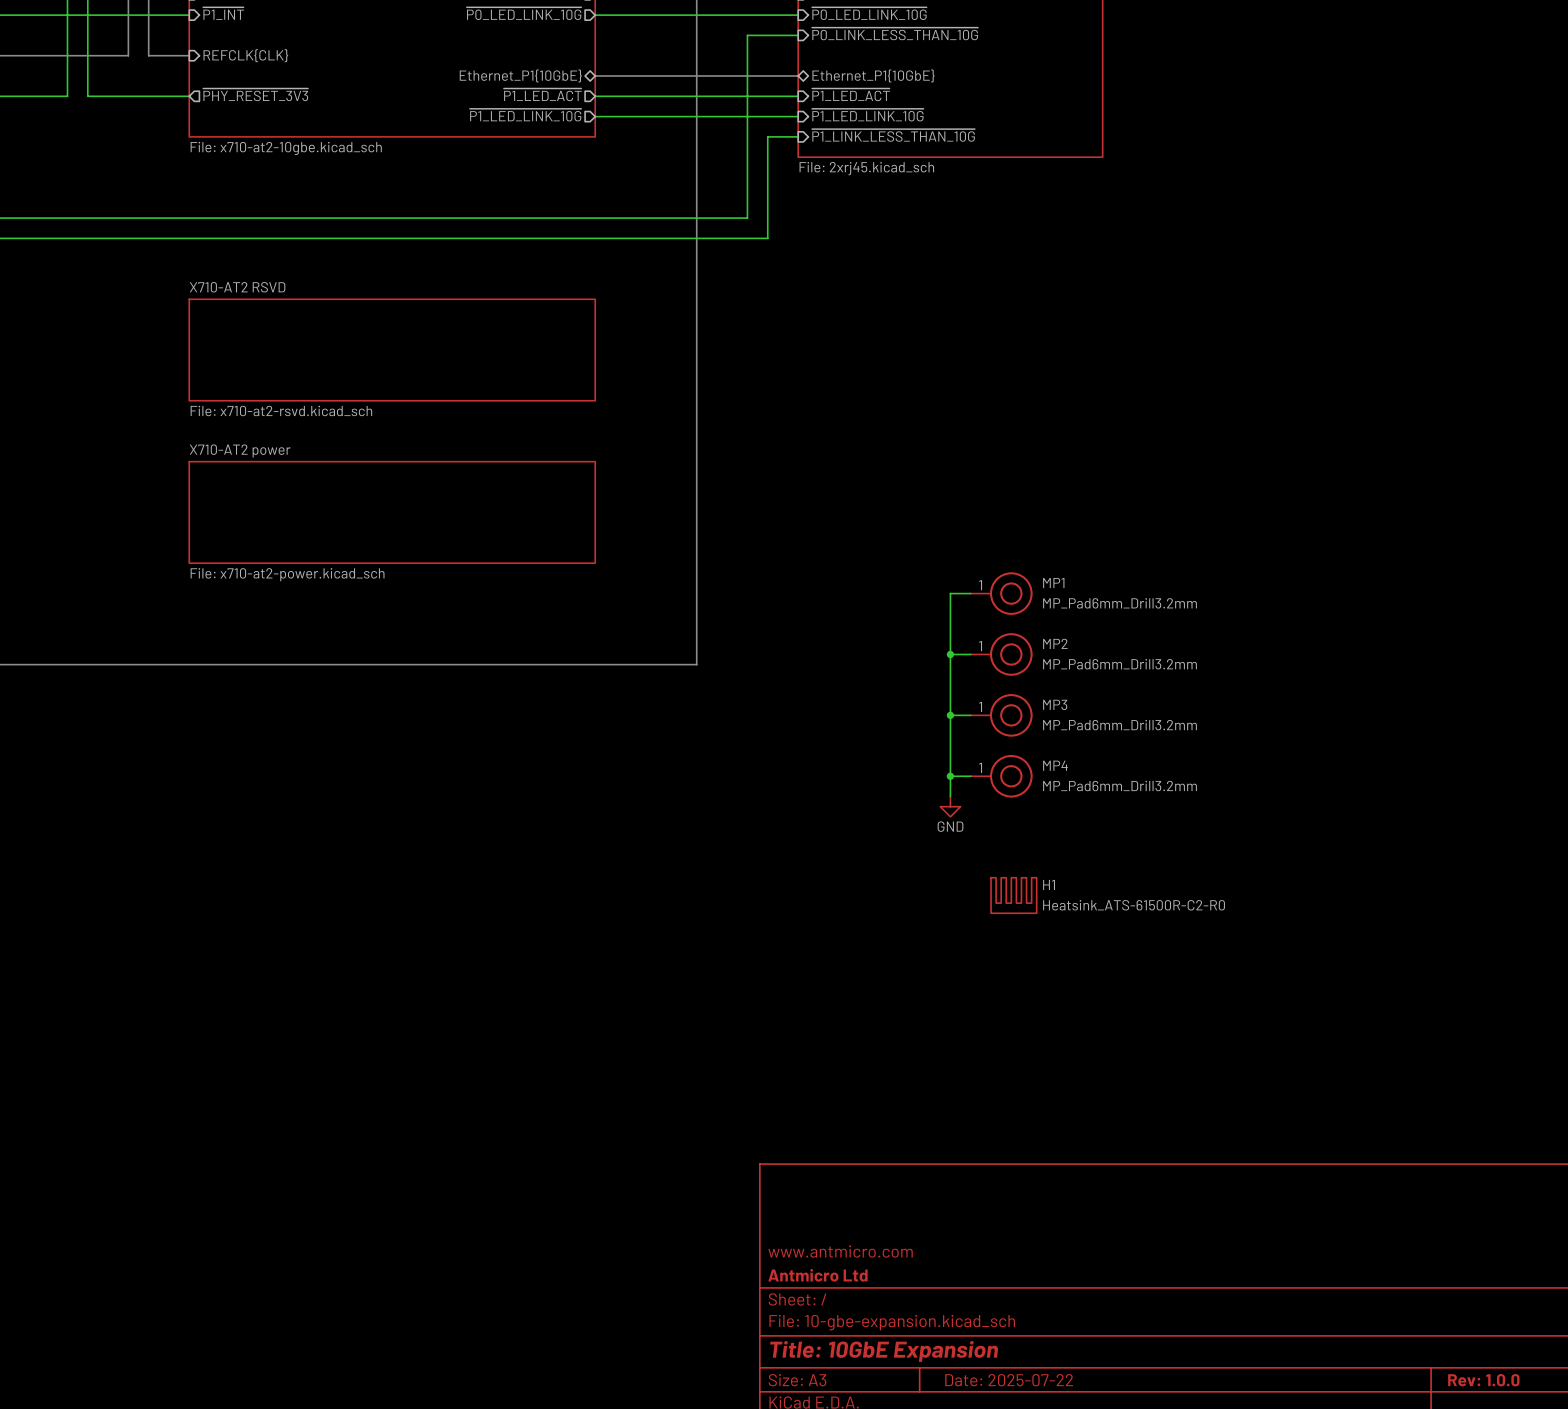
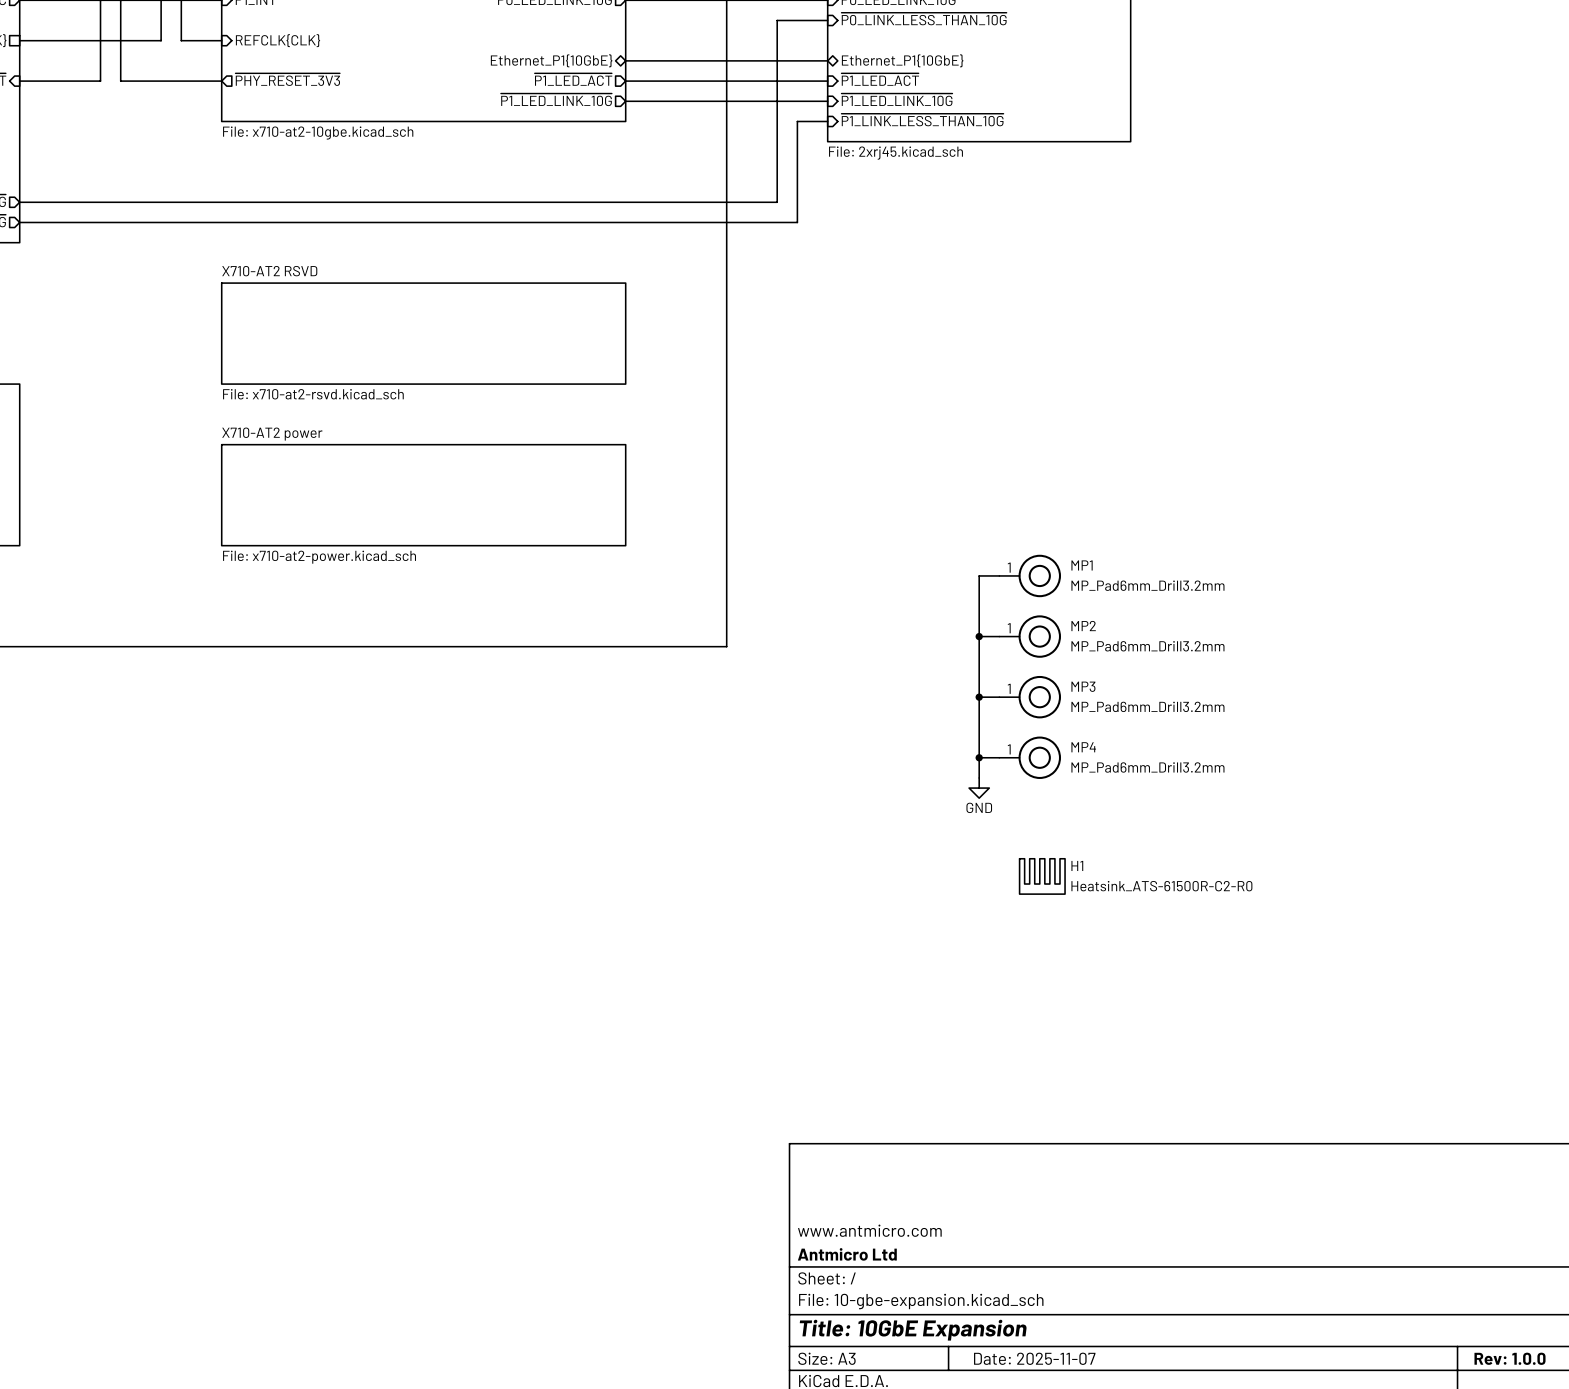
title block: Date: 2025-07-22 (1009, 1380) -> Date: 2025-11-07 (1034, 1358)

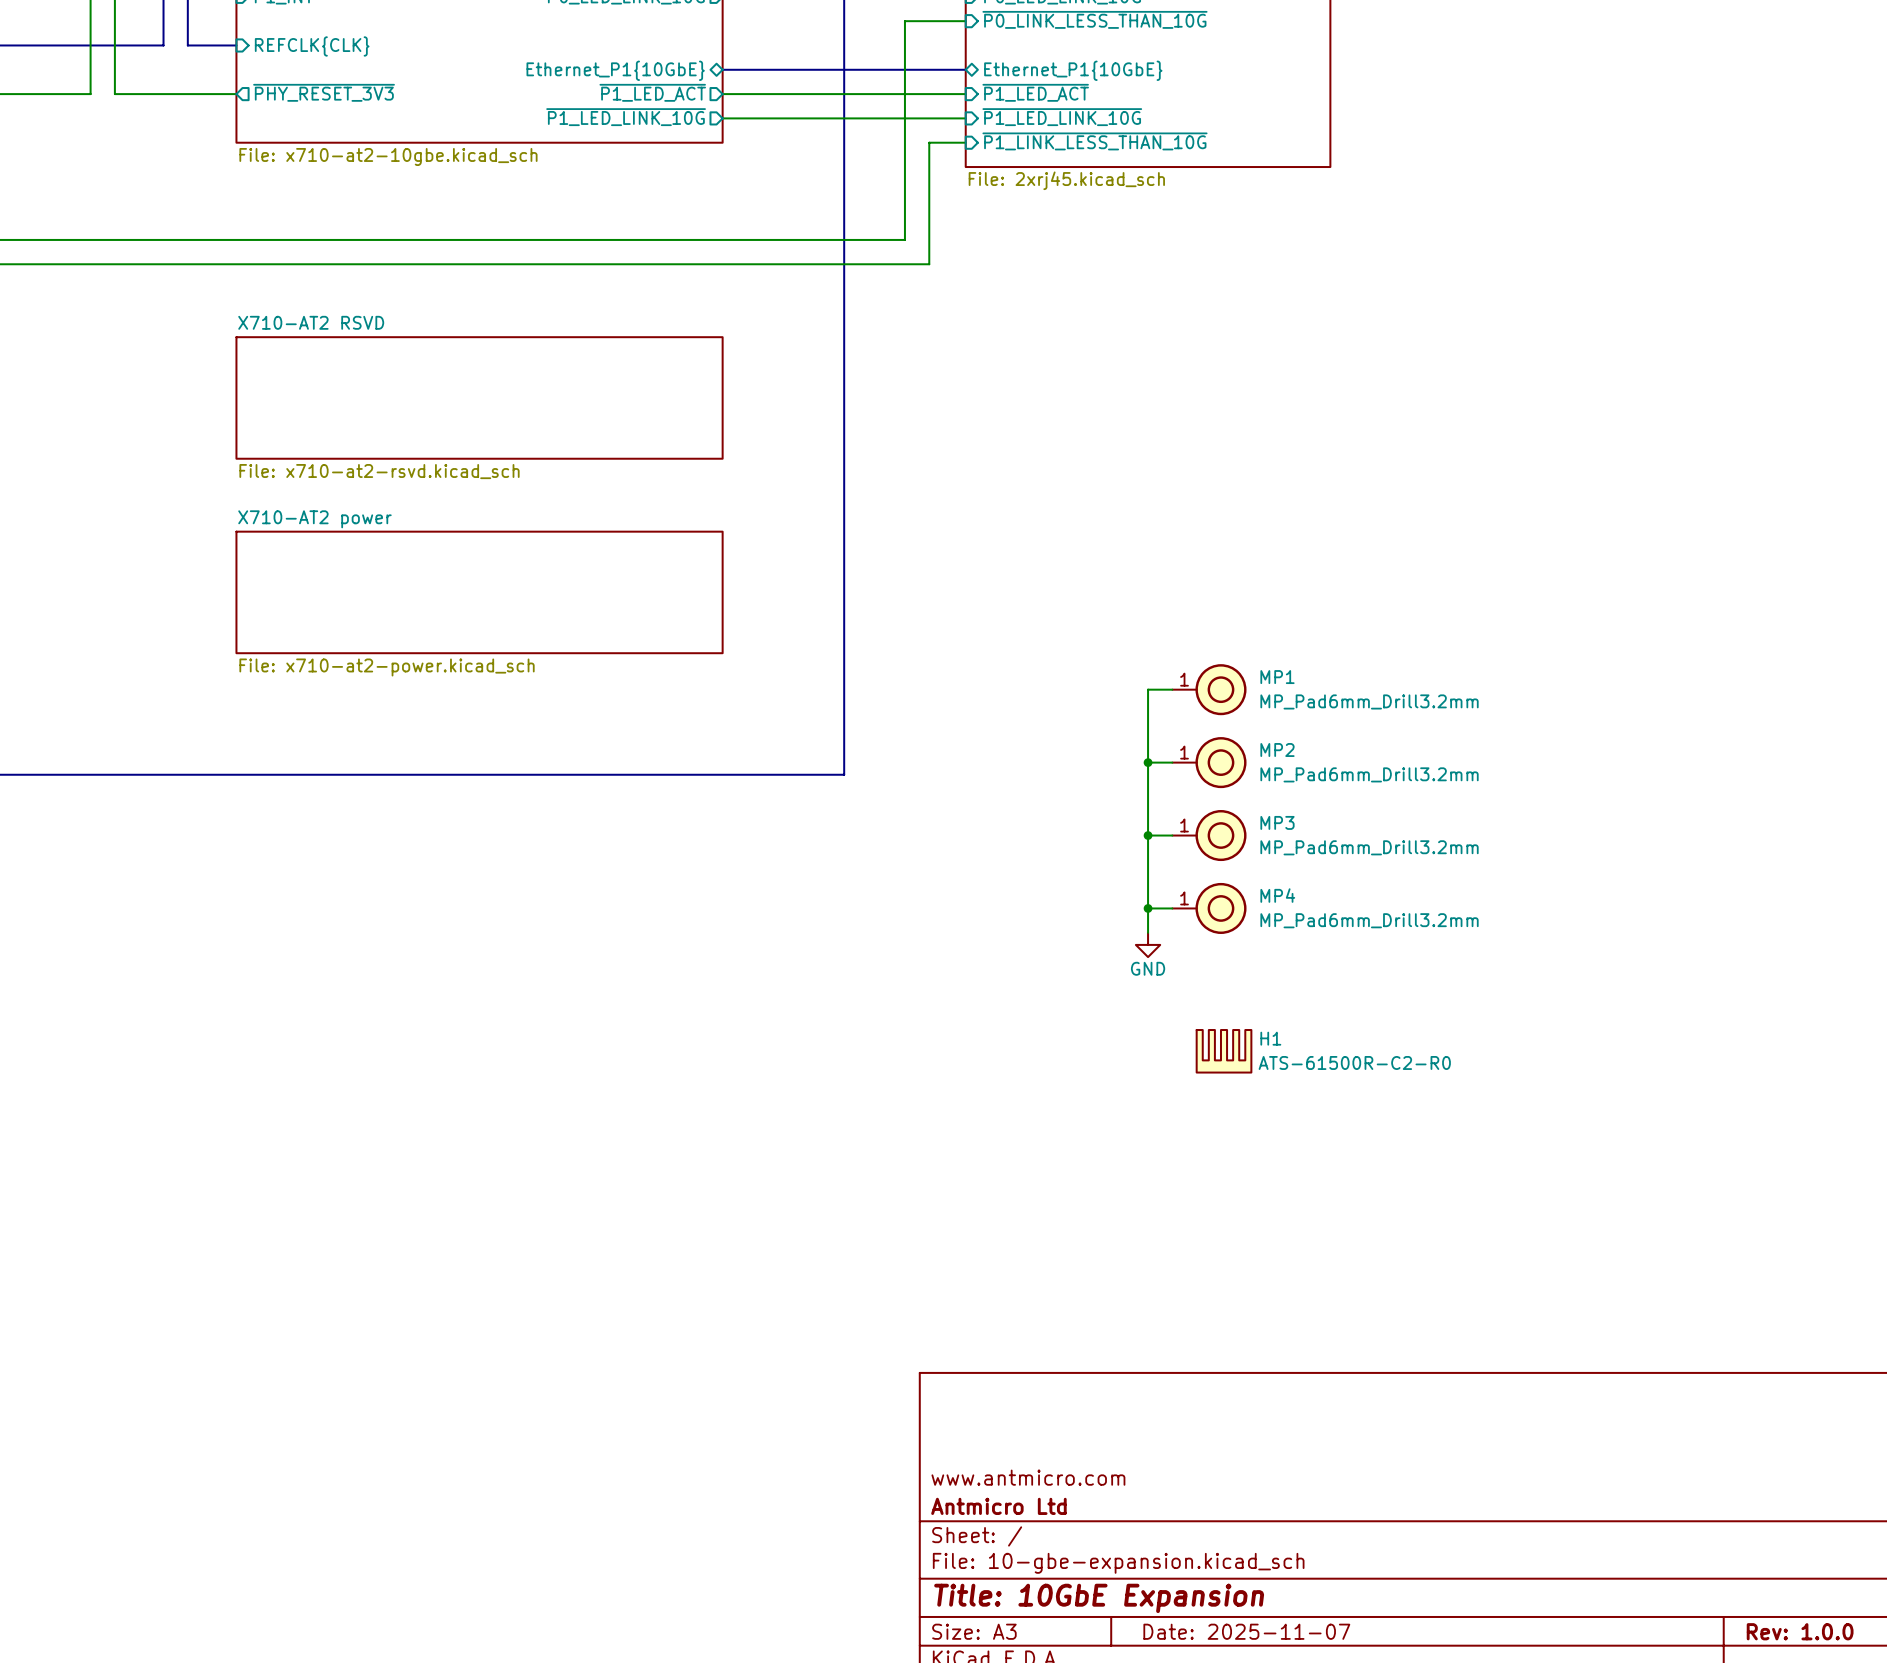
H1 text: none -> ATS-61500R-C2-R0 (1354, 1062)
H1 value: Heatsink_ATS-61500R-C2-R0 (1161, 886) -> none

